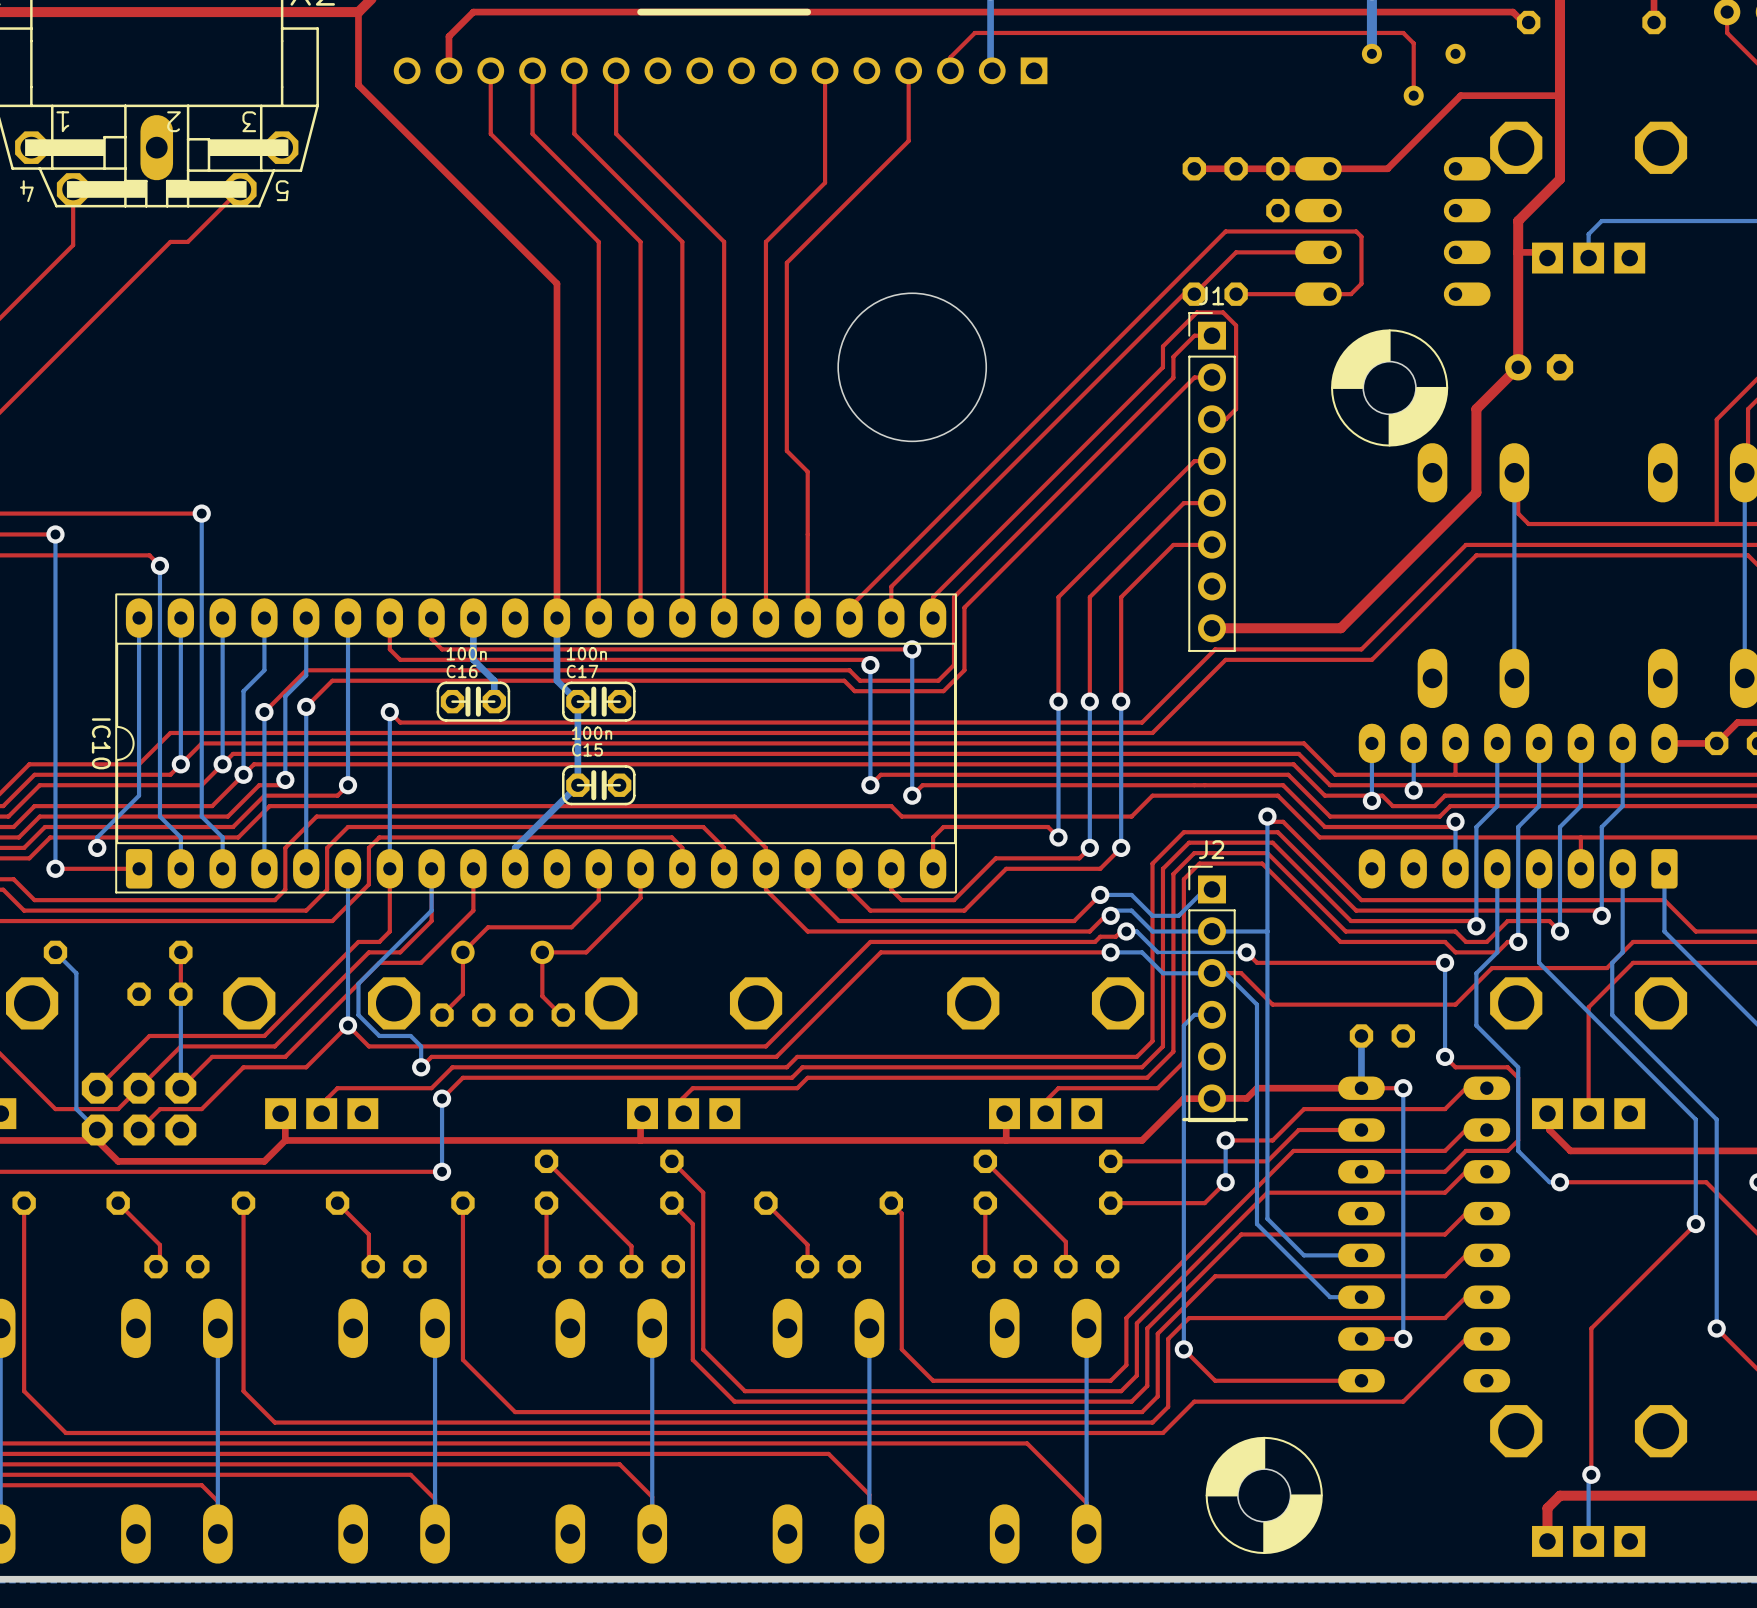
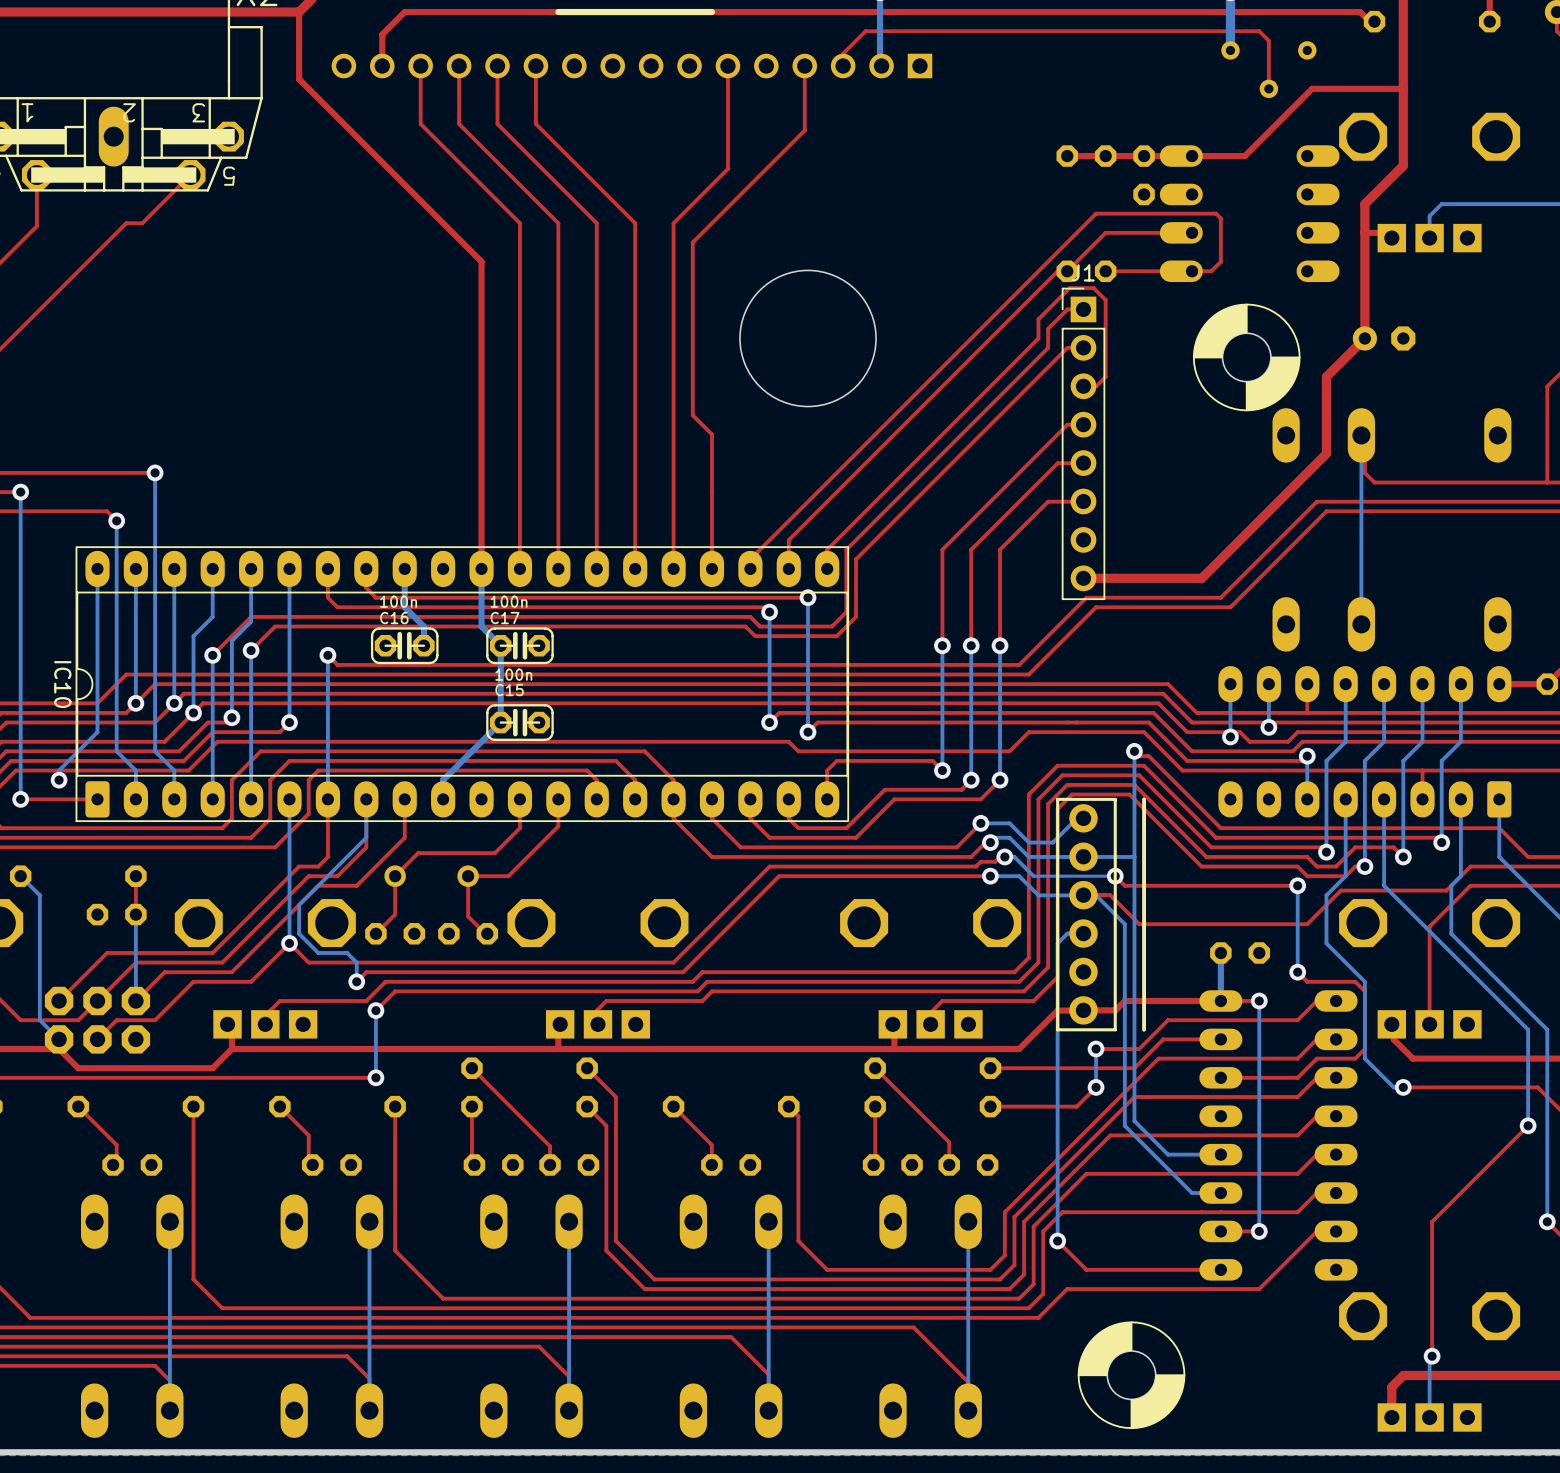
line: none -> (1144, 799) (1144, 1029)
part: none -> (1083, 818)
part: none -> (1083, 895)
J2: (1211, 993) -> none
part: none -> (1083, 991)
line: none -> (1115, 1029) (1115, 799) (1057, 799) (1057, 1029)

